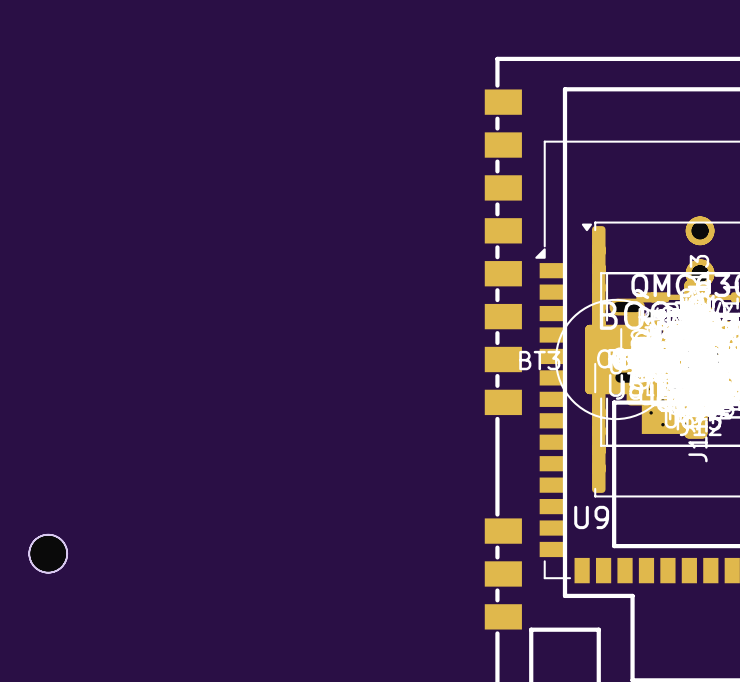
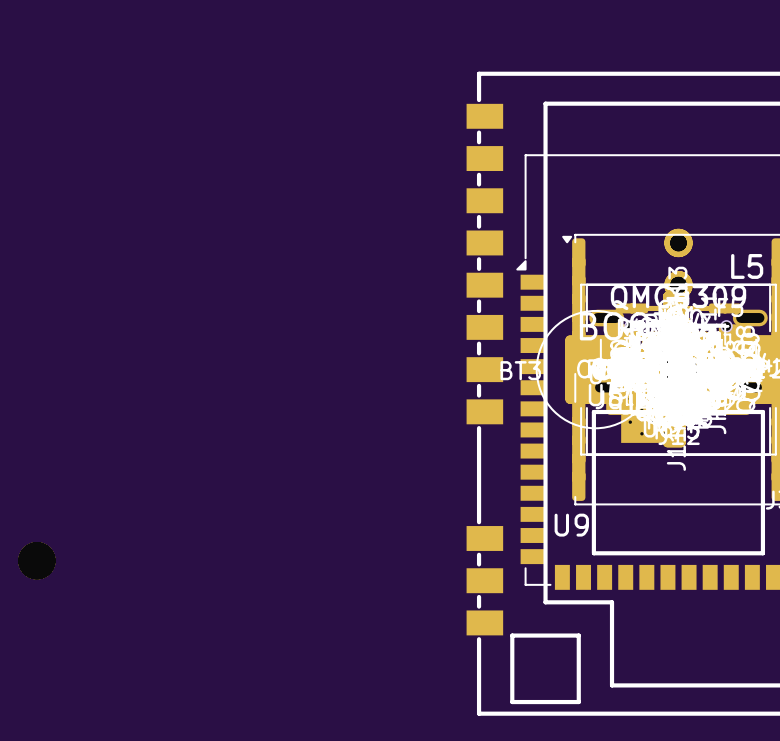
part footprint: [29, 534, 68, 573] -> [18, 542, 56, 580]

